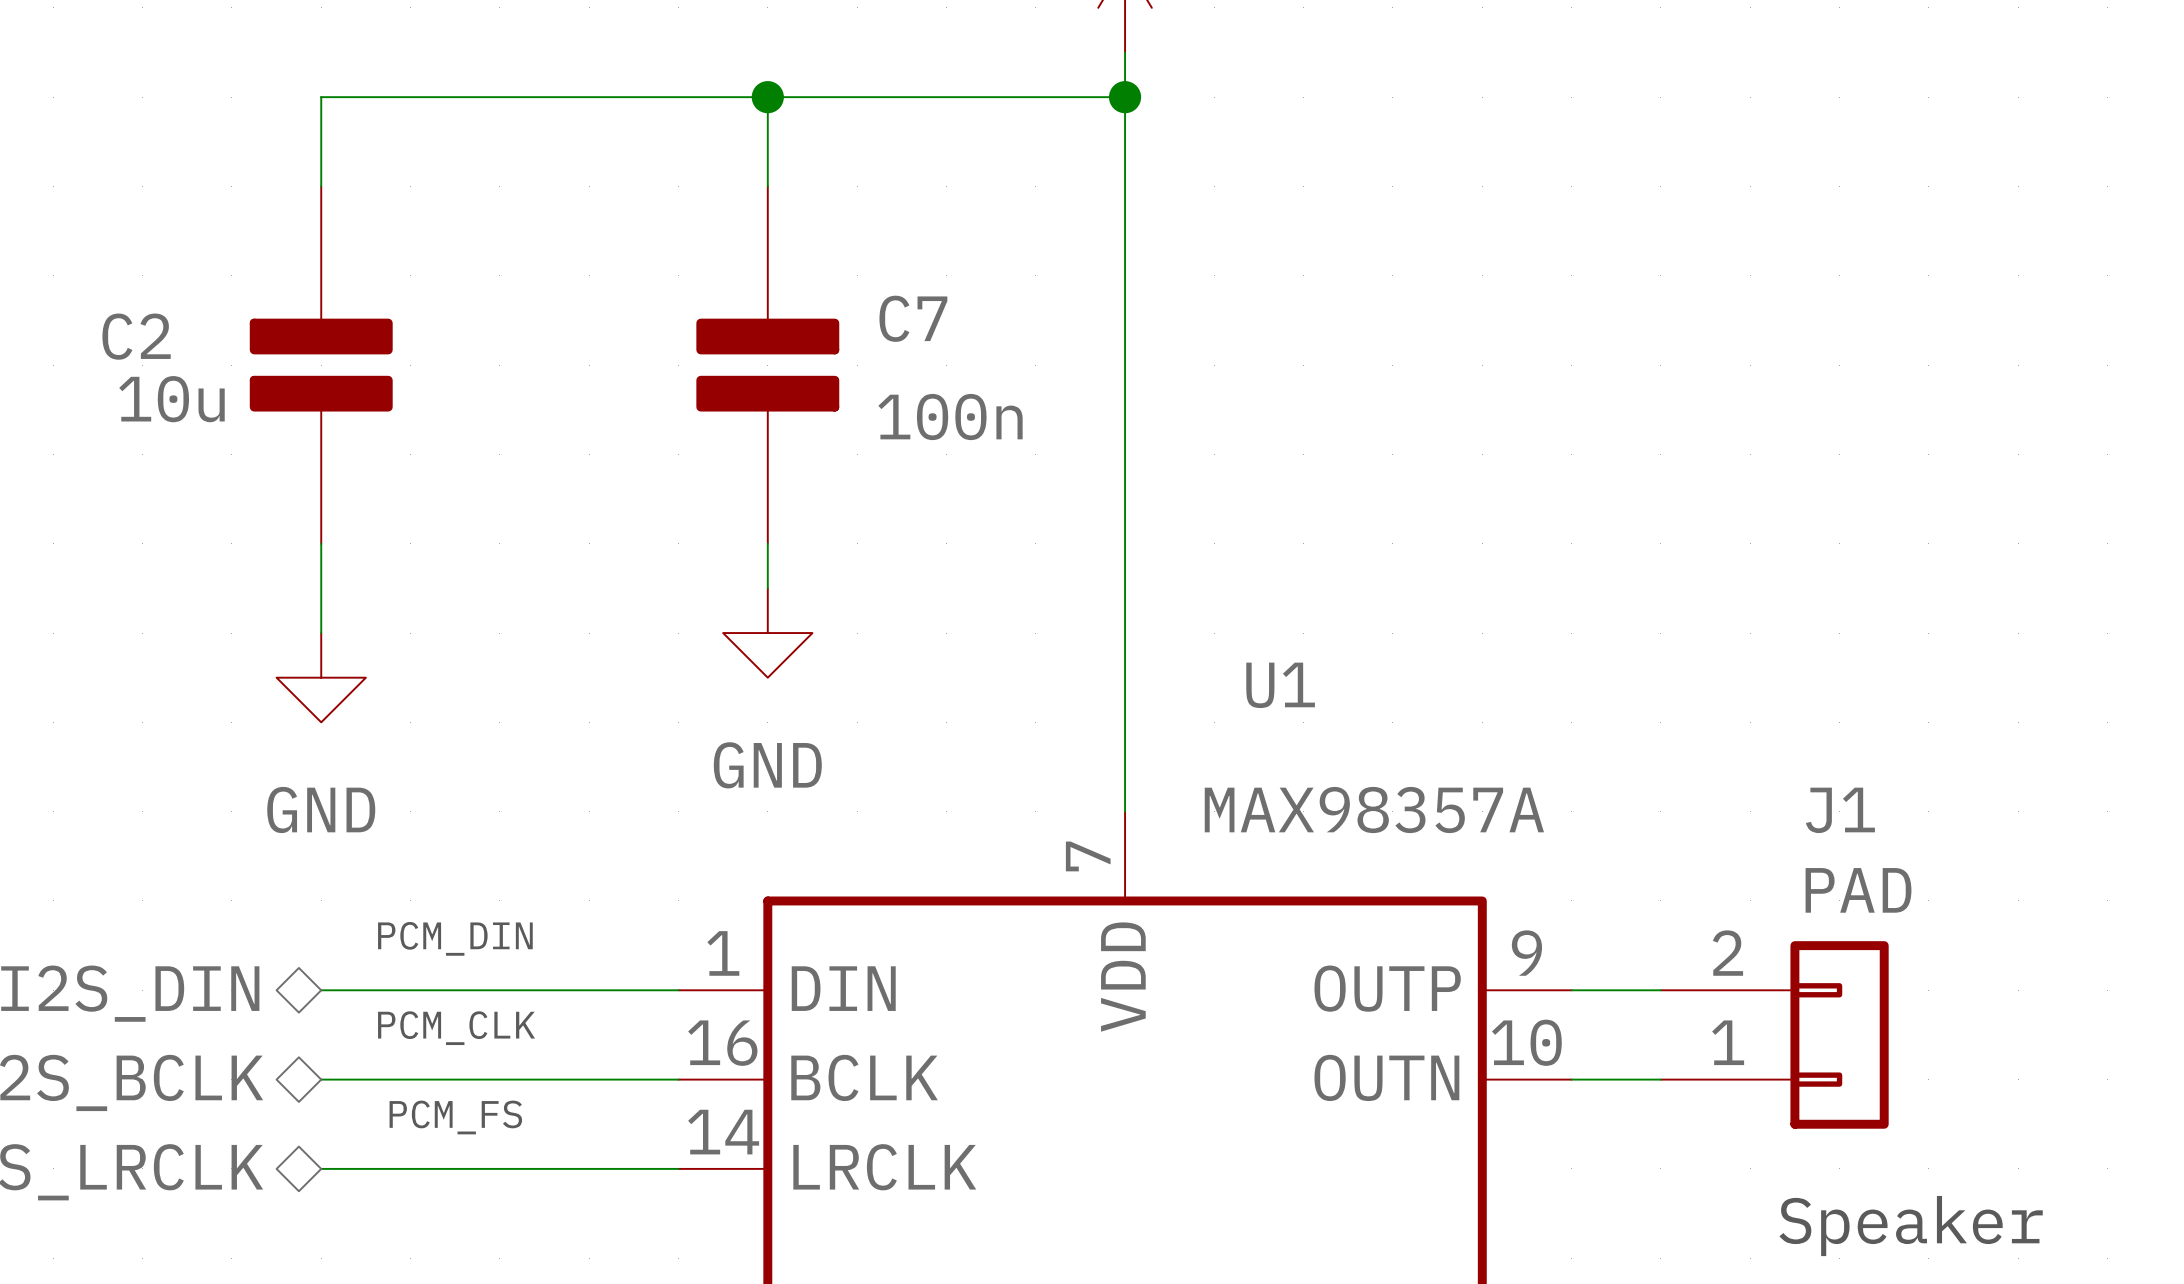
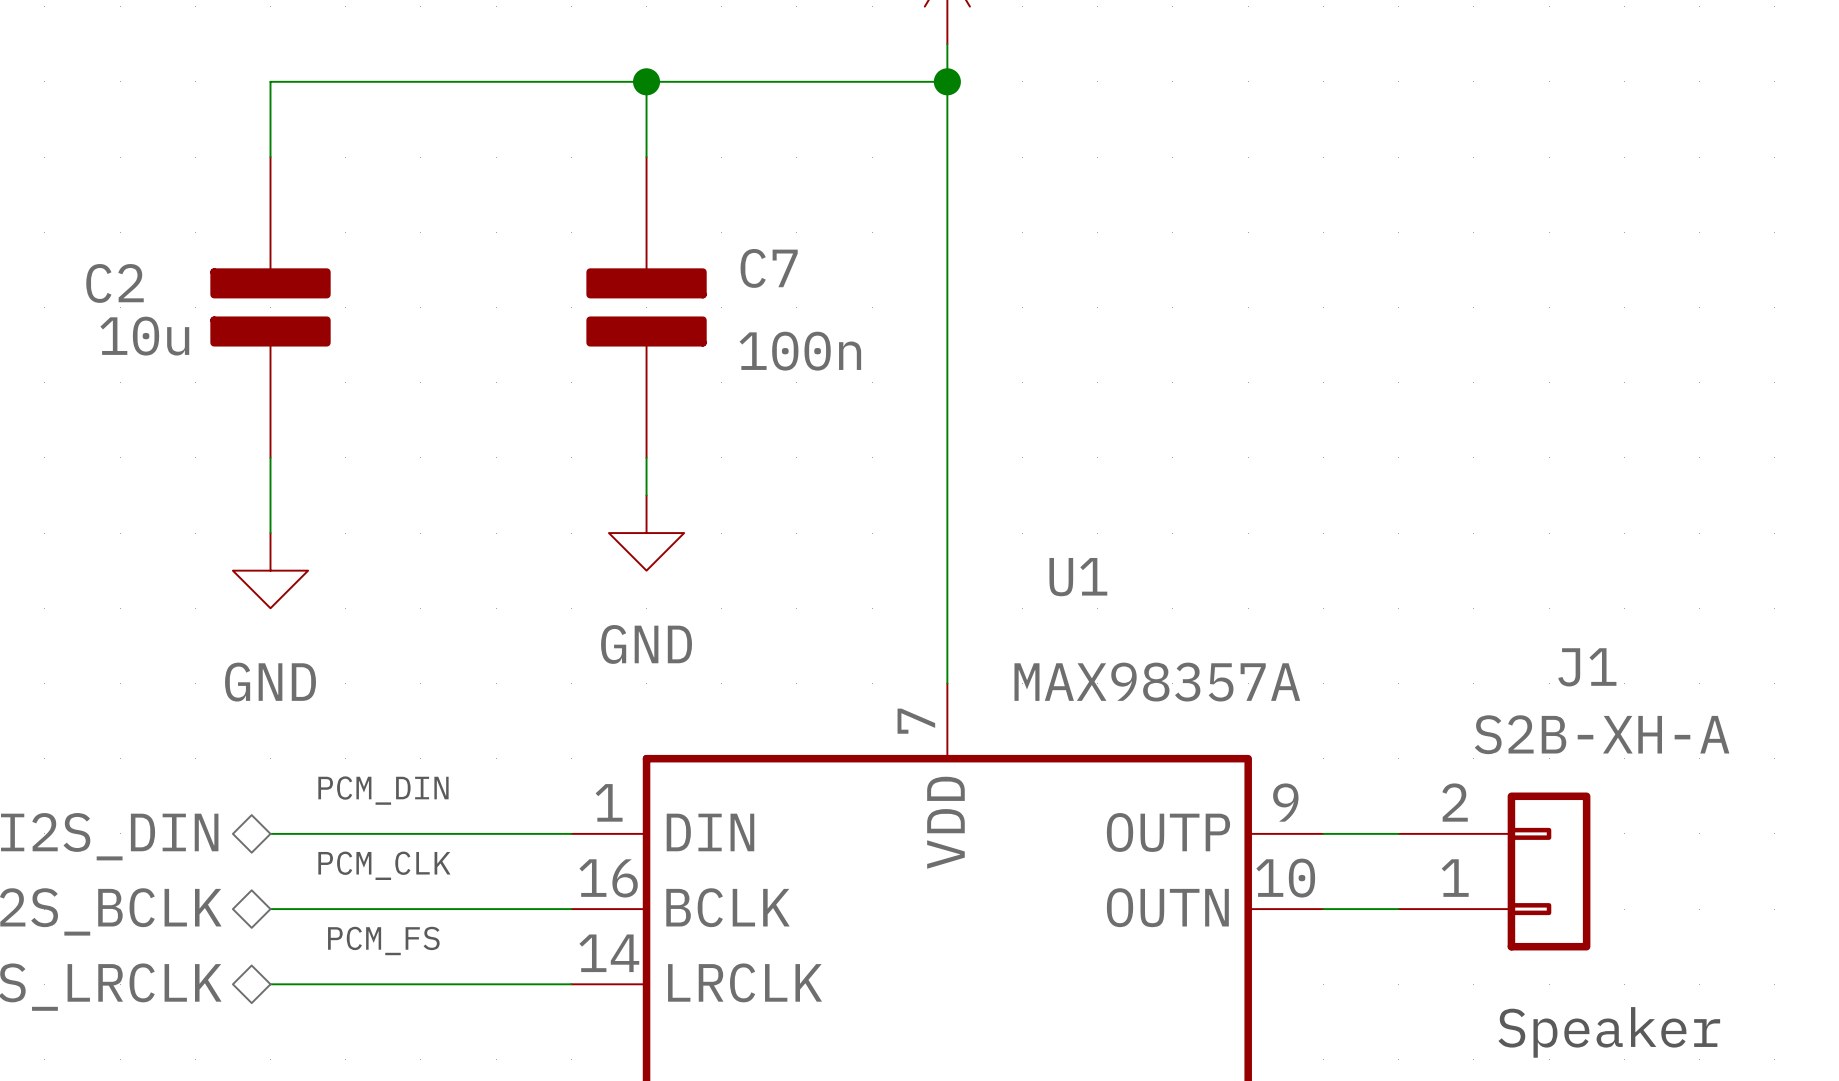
J1 name position: J1 (1840, 810) -> J1 (1587, 667)
J1 value: PAD (1858, 890) -> S2B-XH-A (1602, 734)

